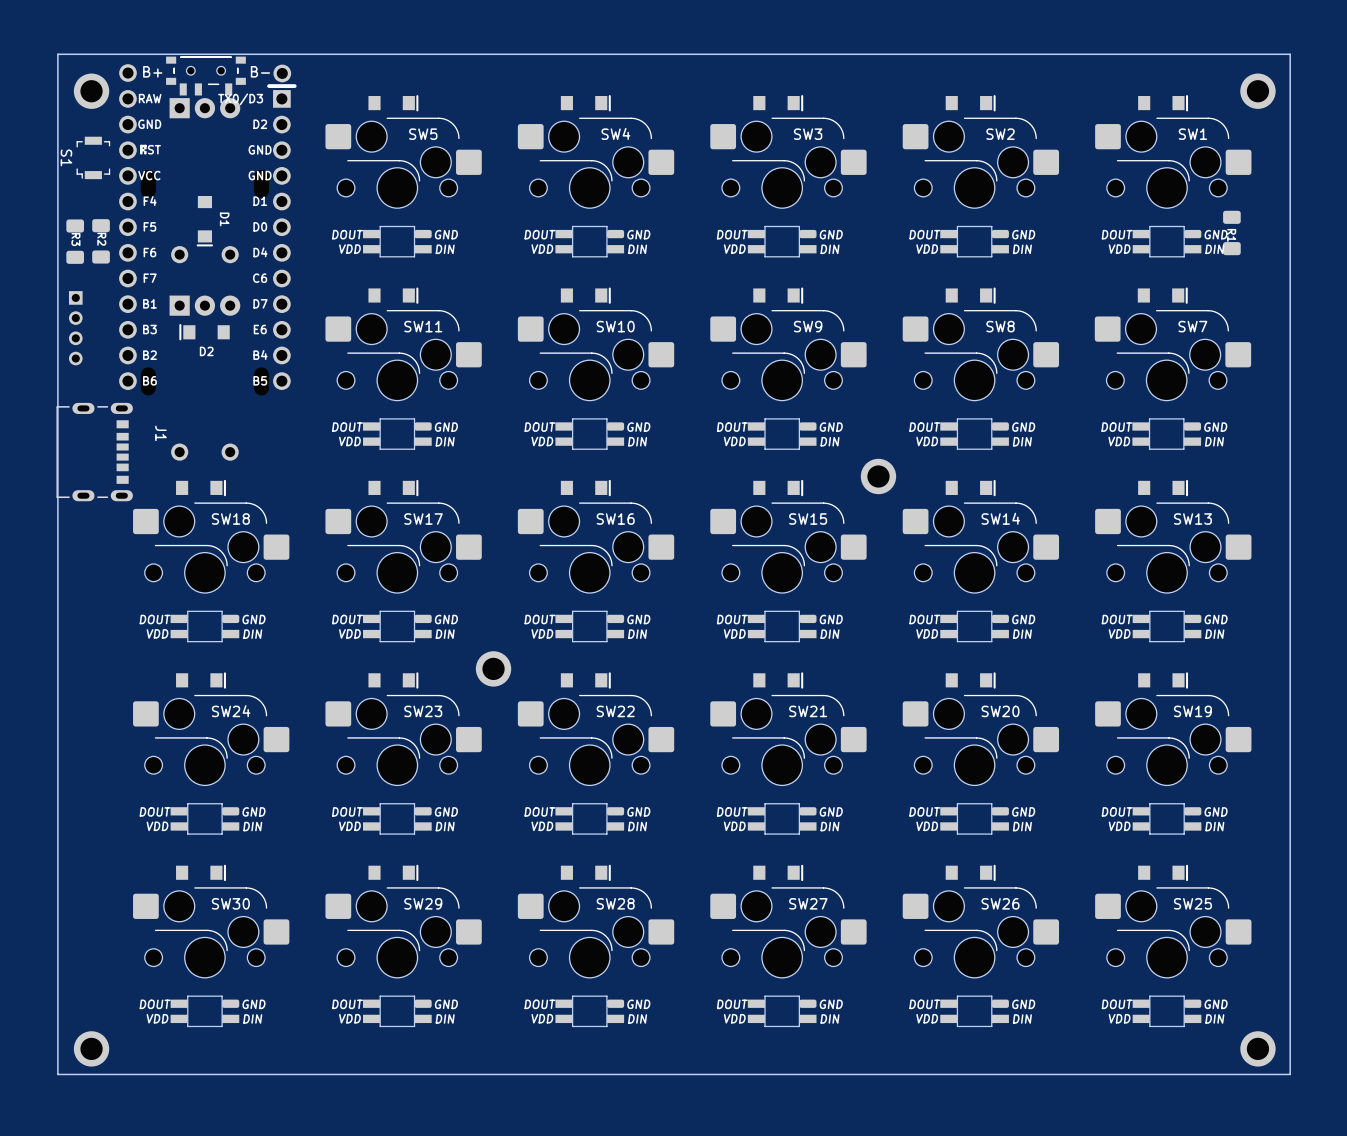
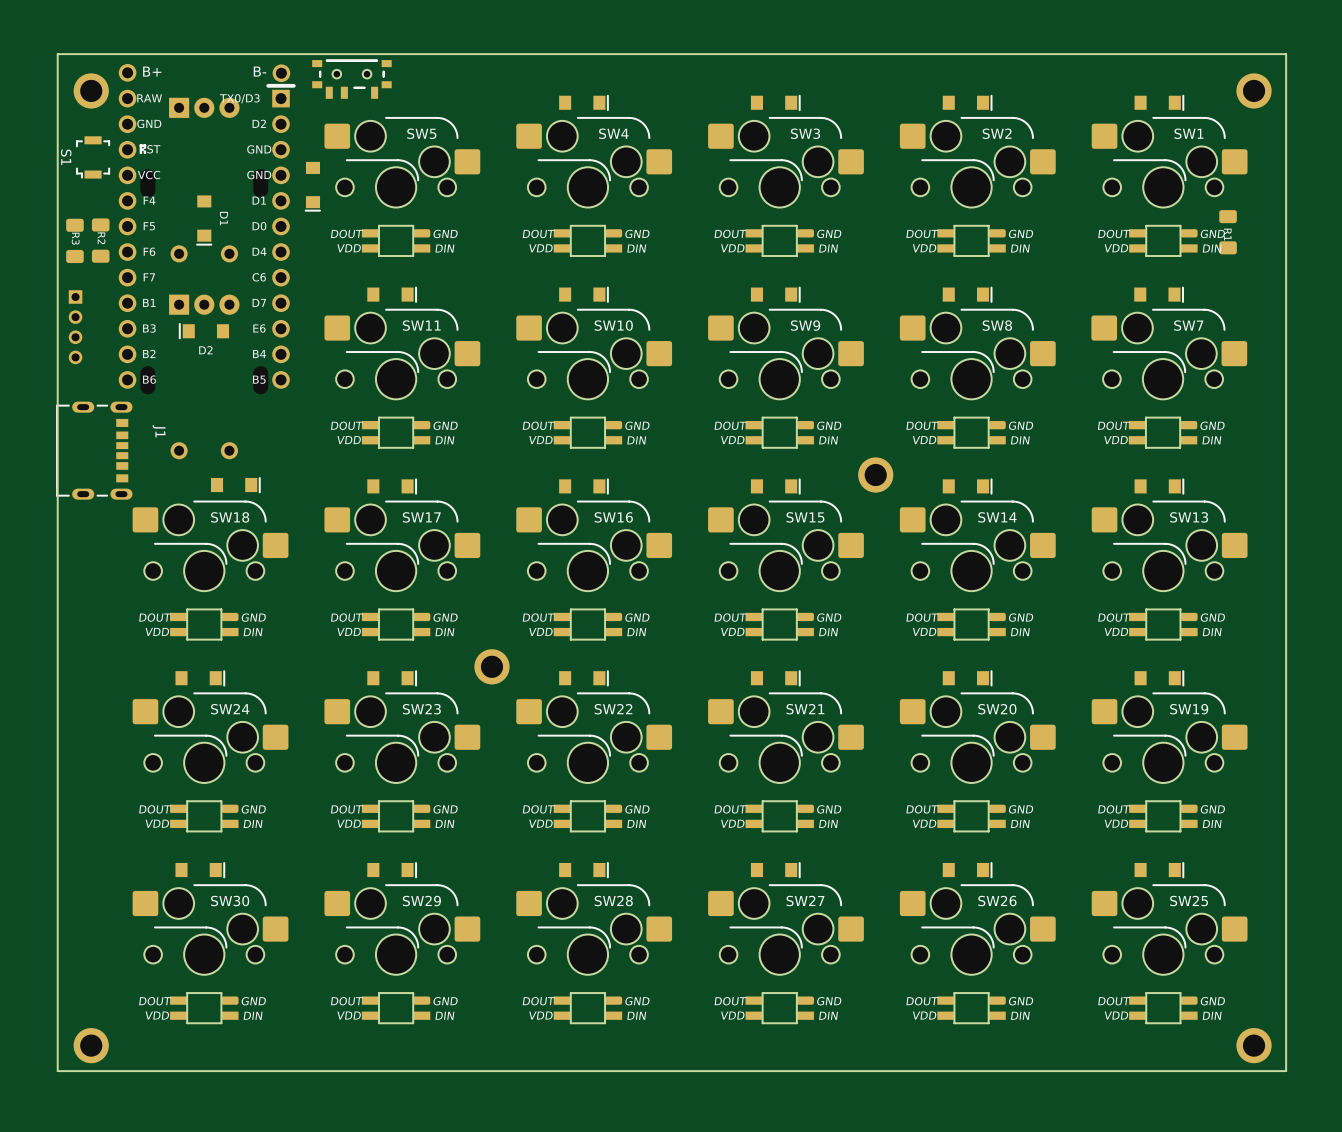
part position: (205, 76) -> (351, 79)
SW5 footprint: [325, 95, 482, 258] -> [304, 117, 481, 257]
SW18 footprint: [133, 479, 290, 643] -> [132, 477, 289, 641]

